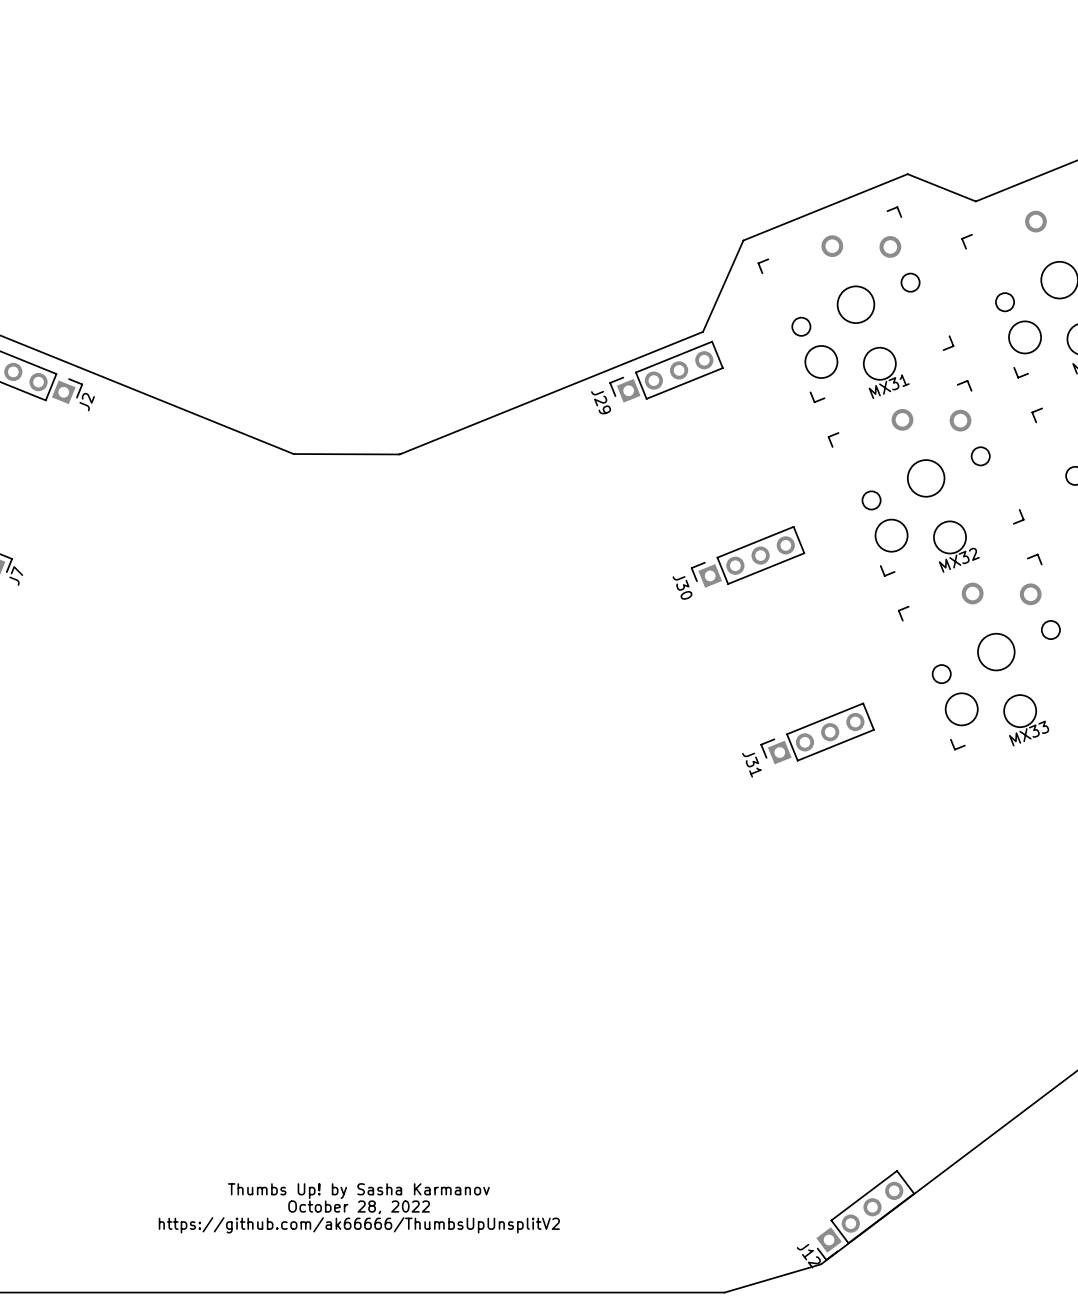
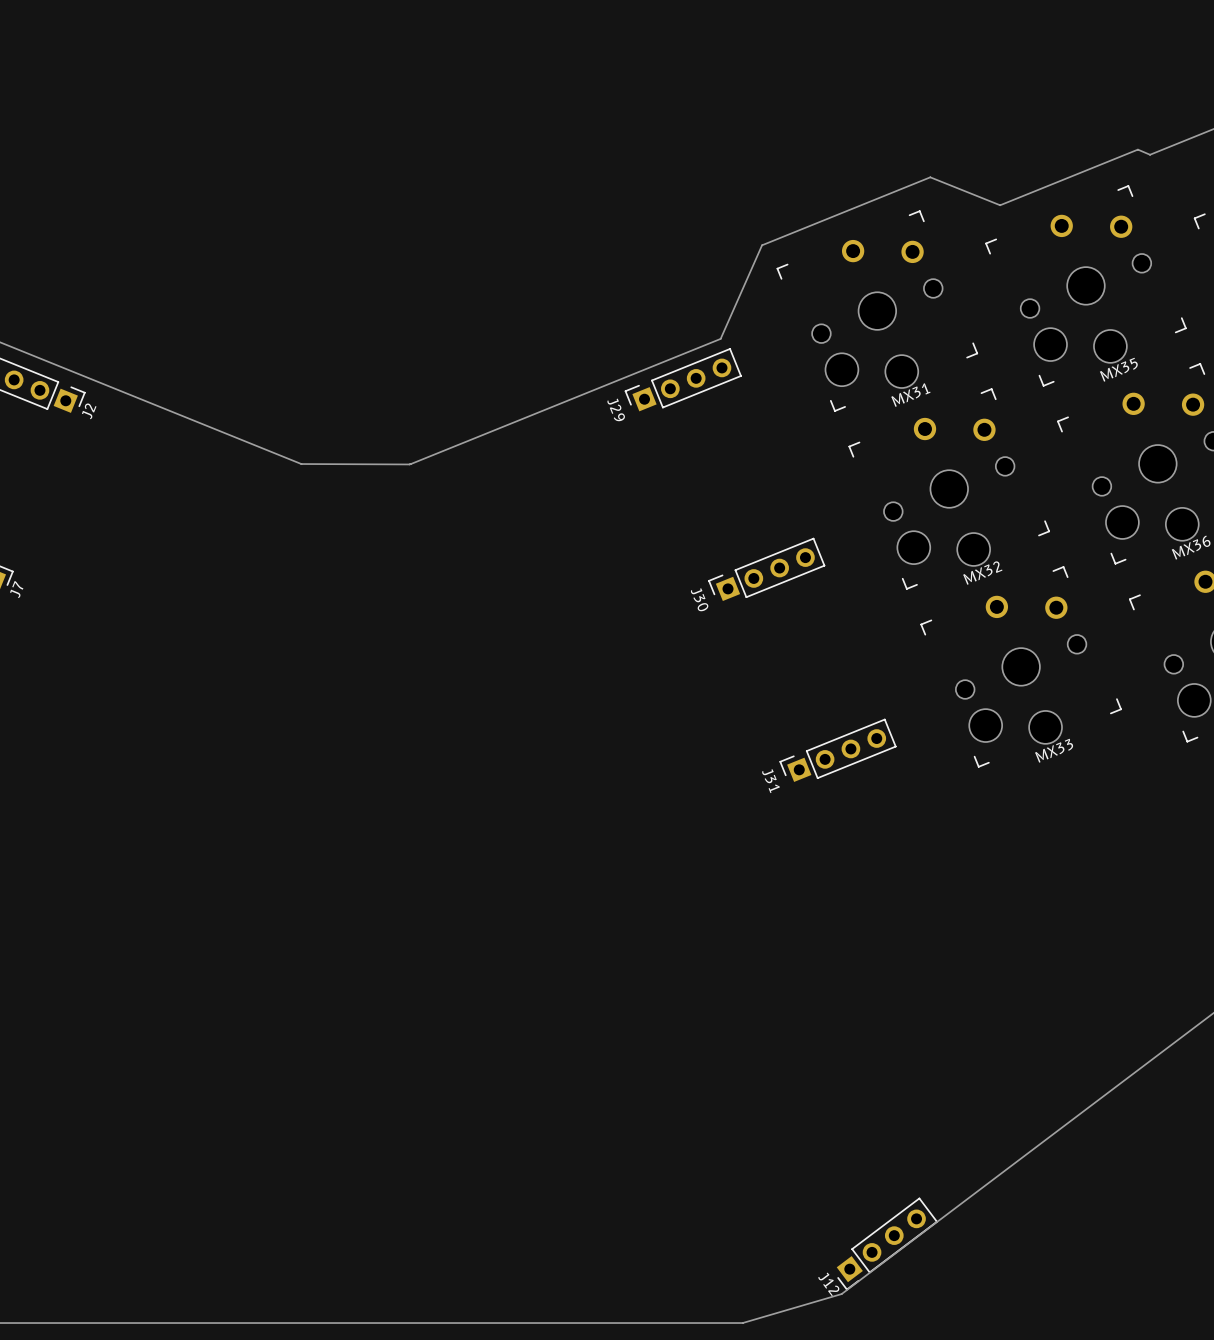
text: Thumbs Up! by Sasha Karmanov (358, 1191) -> none
text: October 28, 2022 (359, 1207) -> none
text: https://github.com/ak66666/ThumbsUpUnsplitV2 (359, 1225) -> none

